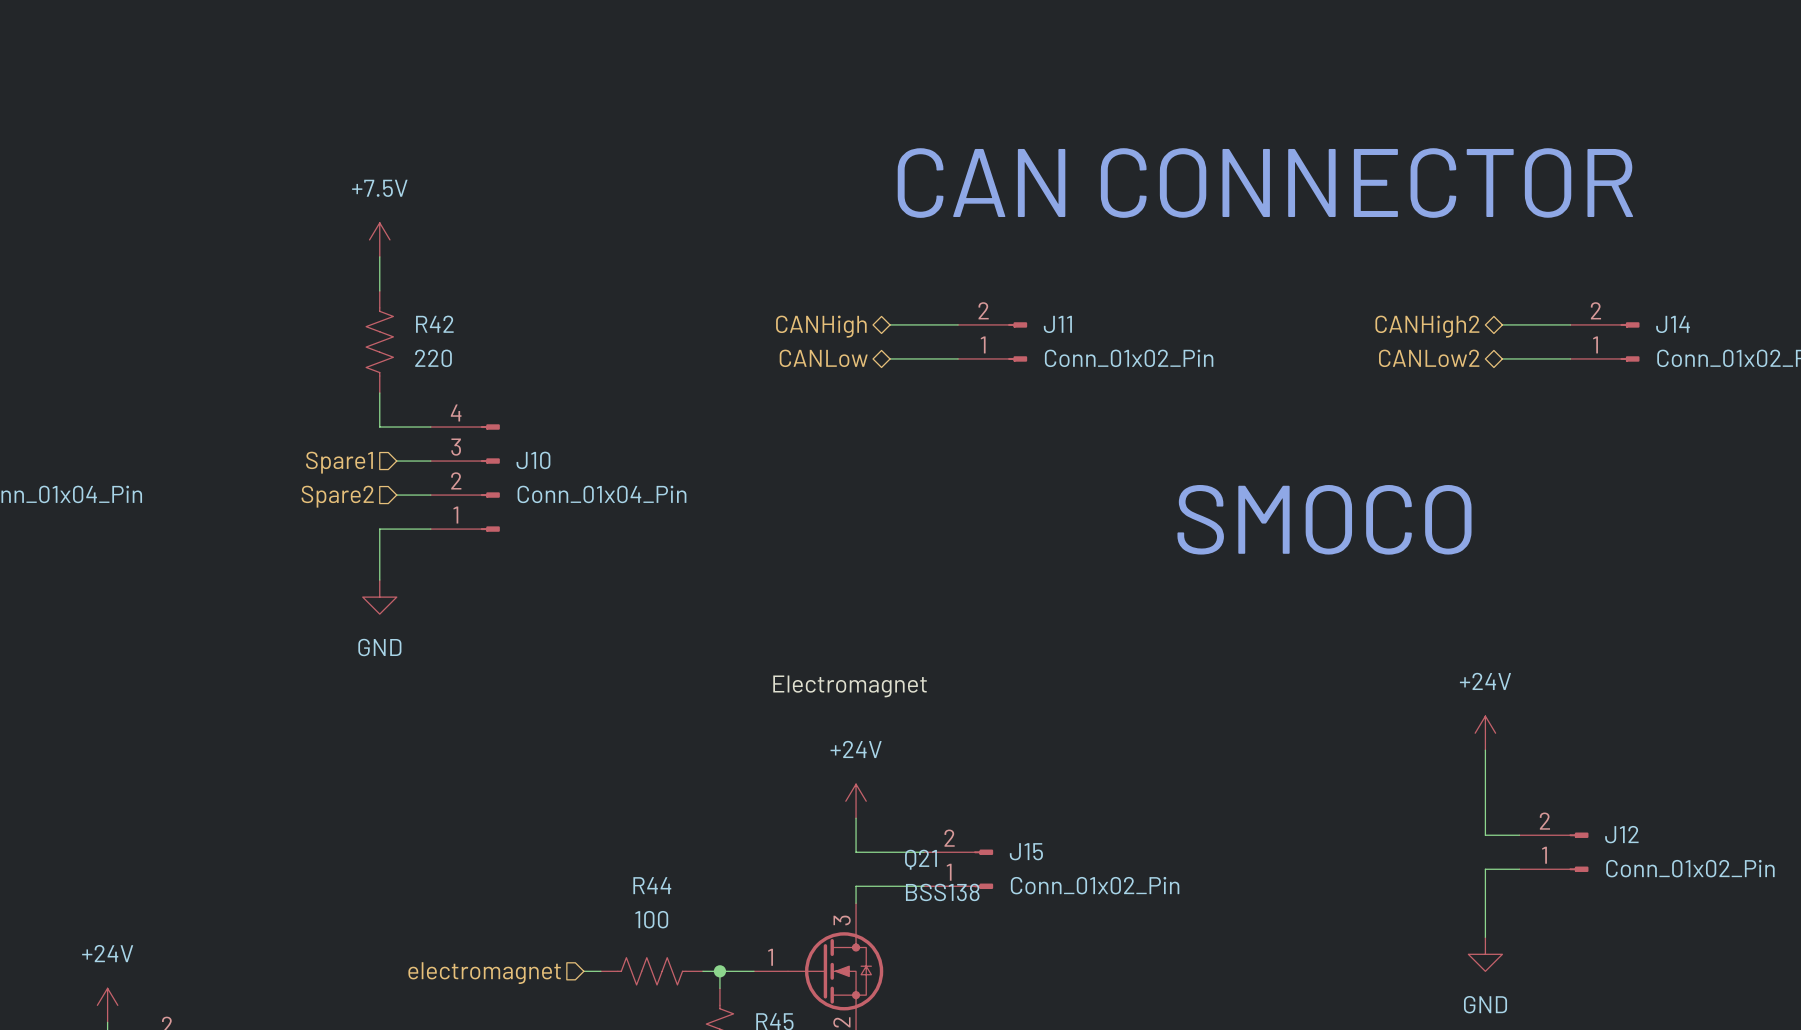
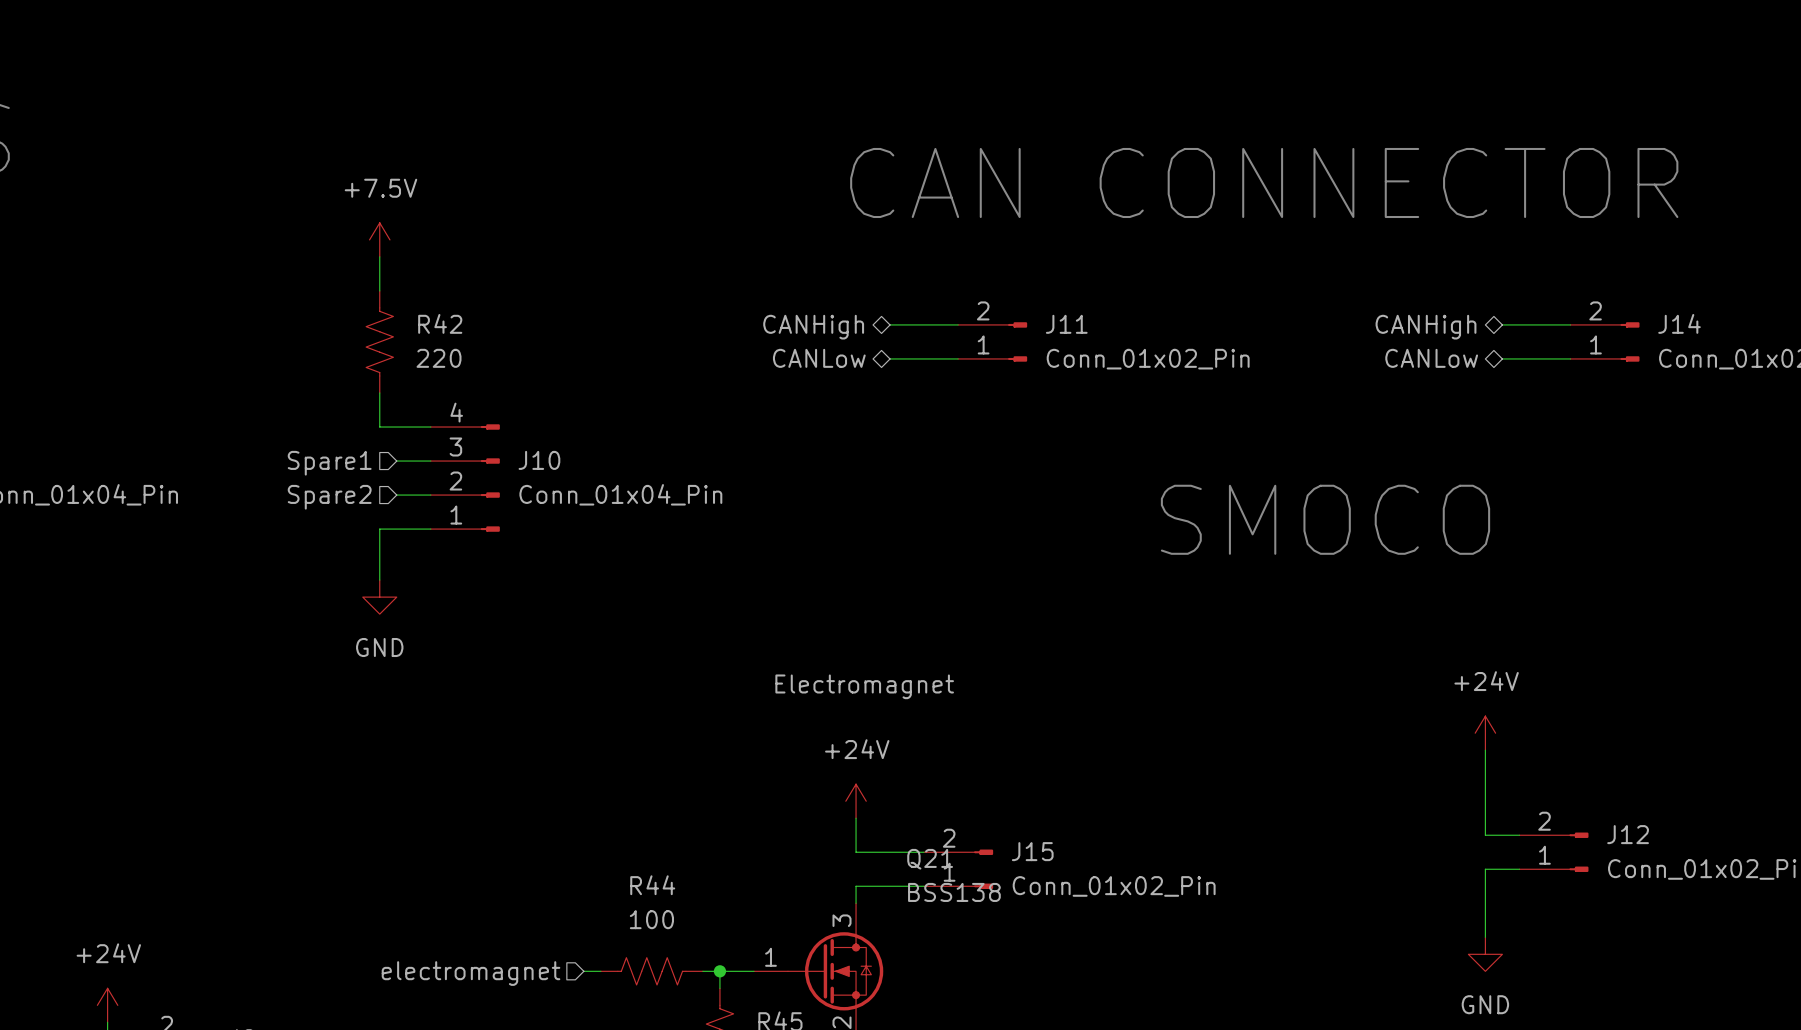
hierarchical label: CANHigh2 (1427, 326) -> CANHigh (1426, 327)
hierarchical label: CANLow2 (1429, 358) -> CANLow (1431, 358)

